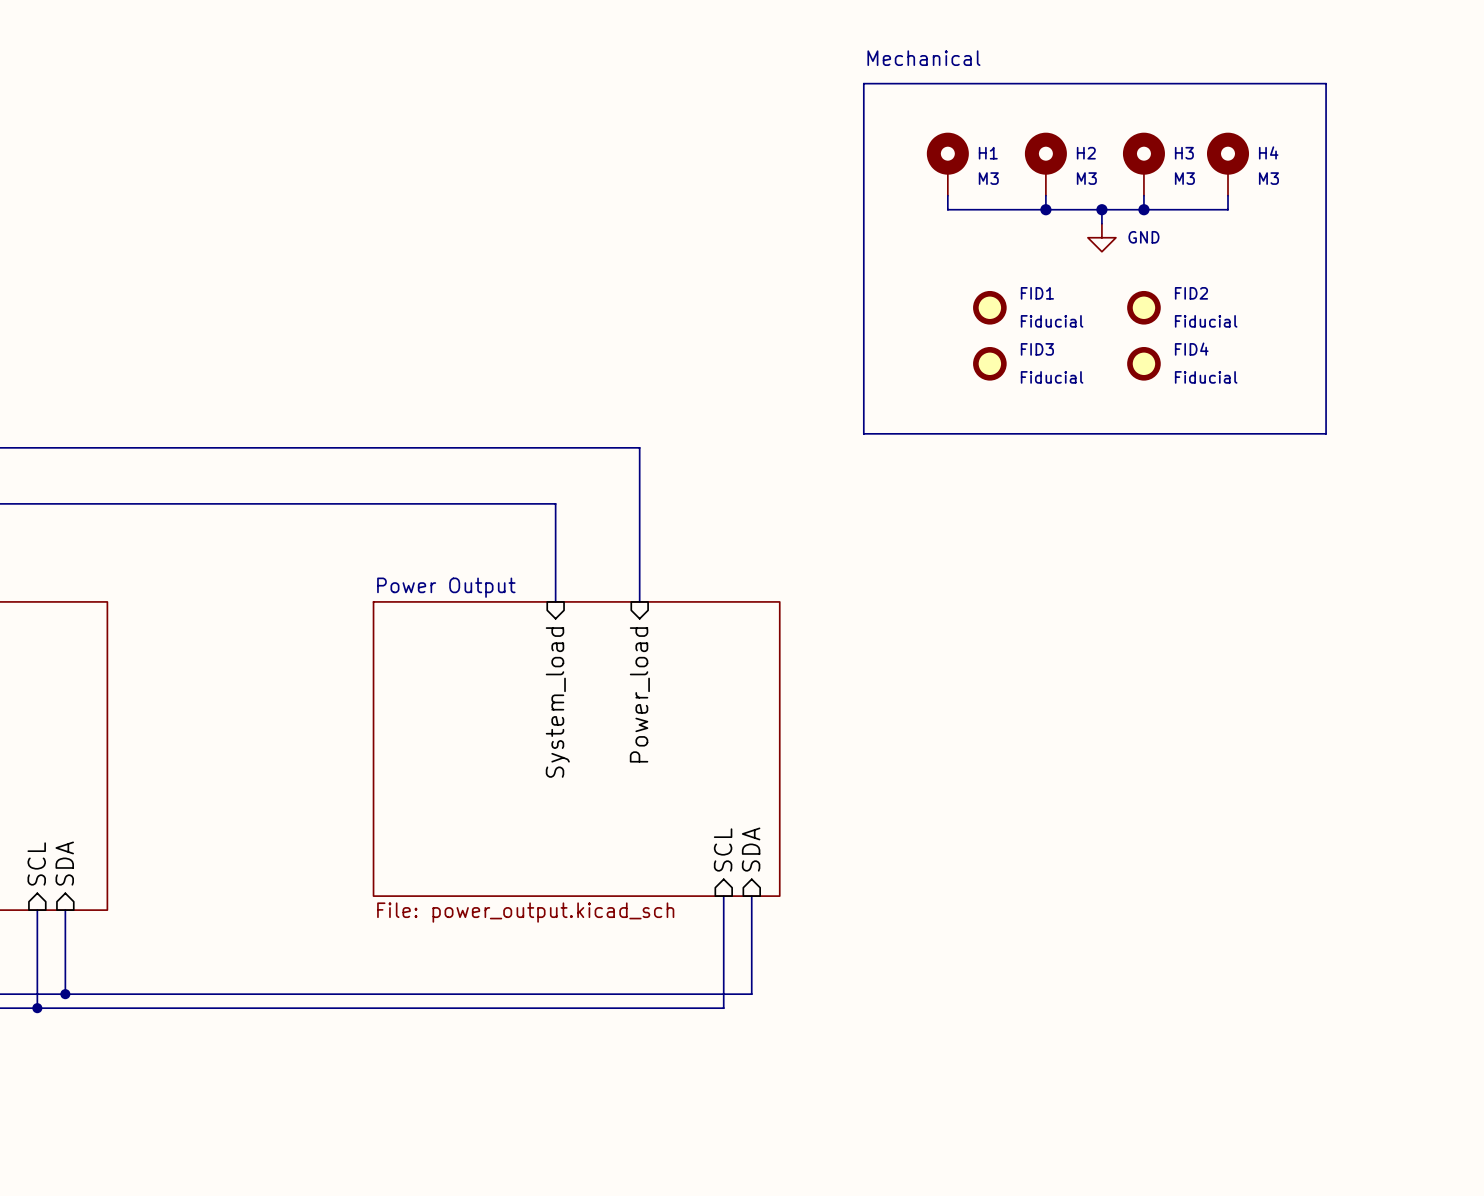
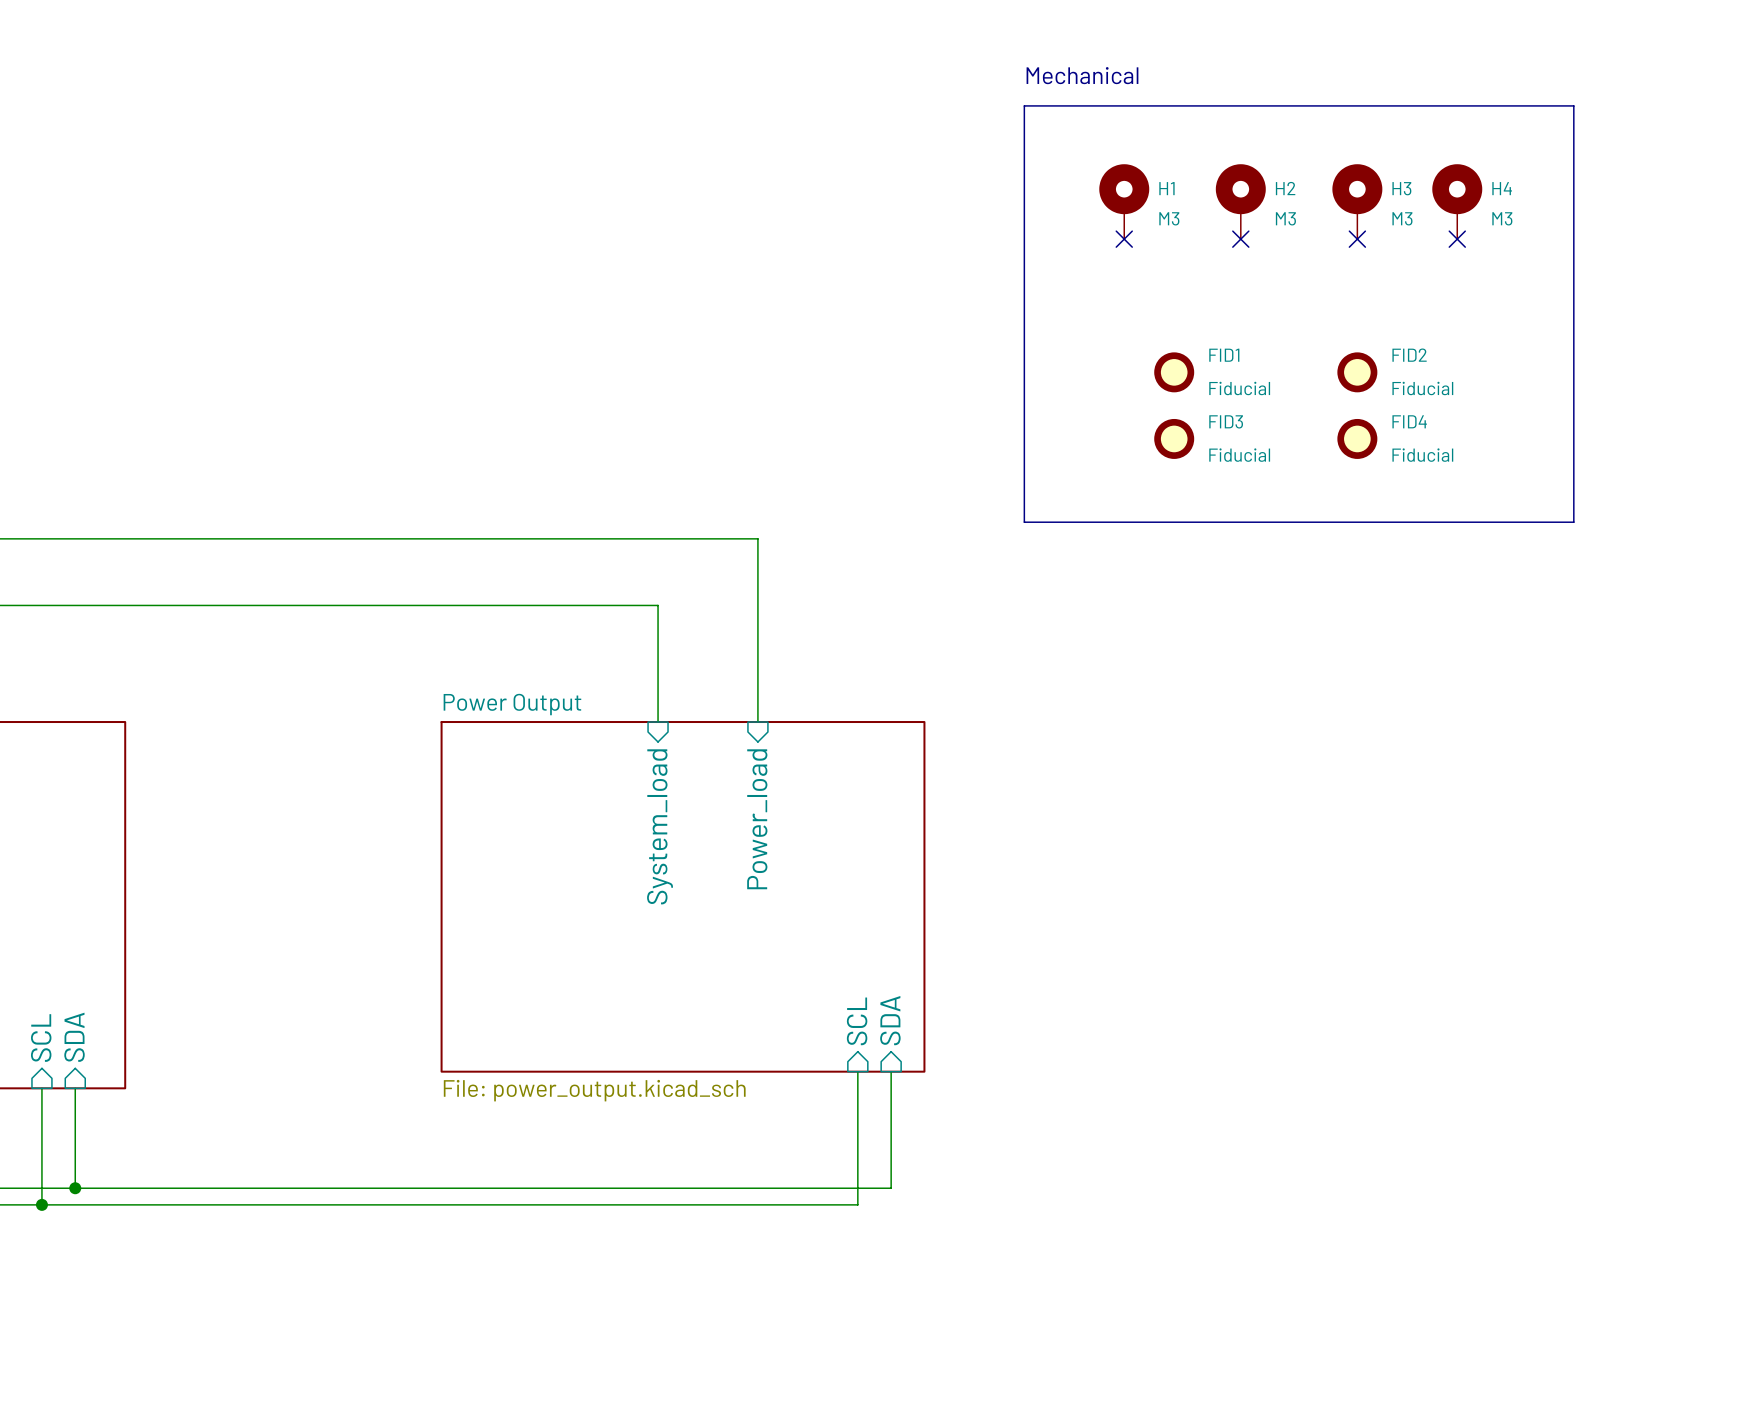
wire: (947, 195) (947, 209) (1228, 209) (1228, 195) -> none
no-connect mark: none -> (1124, 239)
wire: (1045, 195) (1045, 209) -> none
no-connect mark: none -> (1240, 239)
wire: (1143, 195) (1143, 209) -> none
no-connect mark: none -> (1357, 239)
no-connect mark: none -> (1457, 239)
junction: (1045, 209) -> none
wire: (1101, 209) (1101, 223) -> none
junction: (1101, 209) -> none
junction: (1143, 209) -> none
power symbol: GND (1101, 237) -> none

